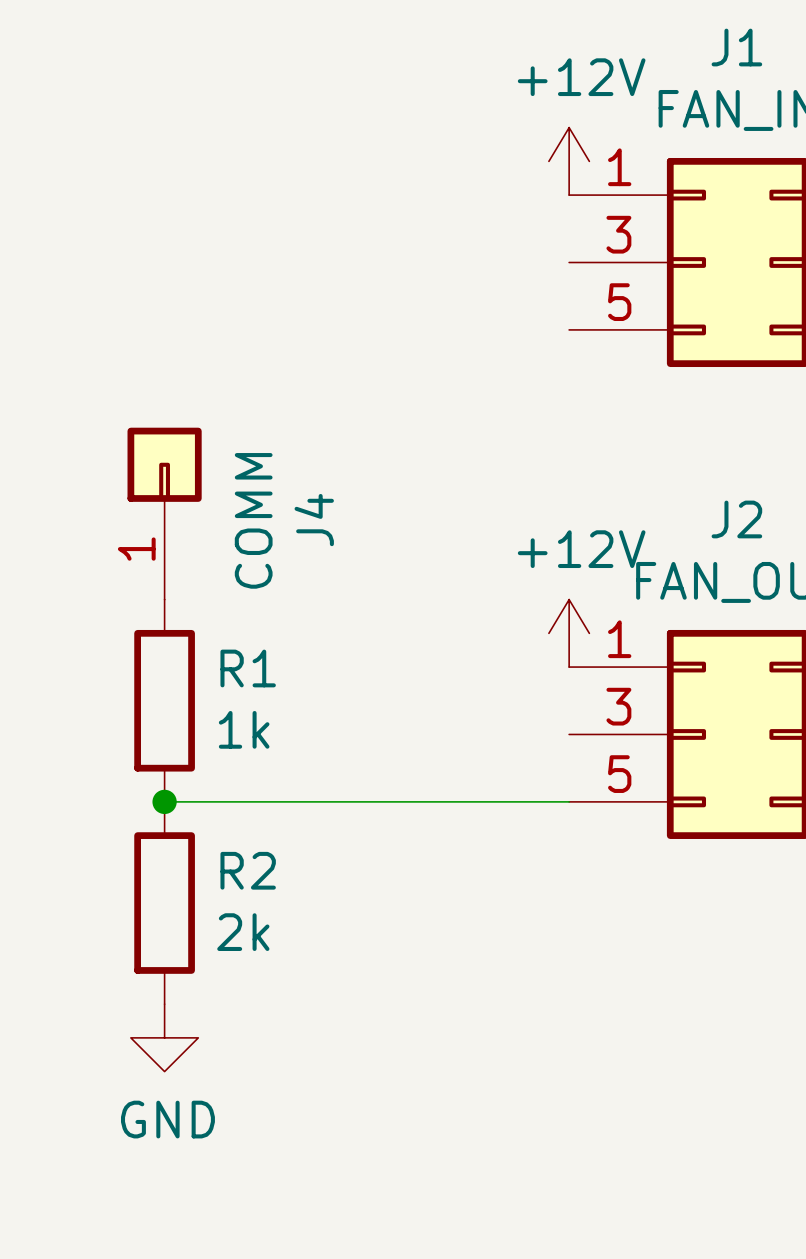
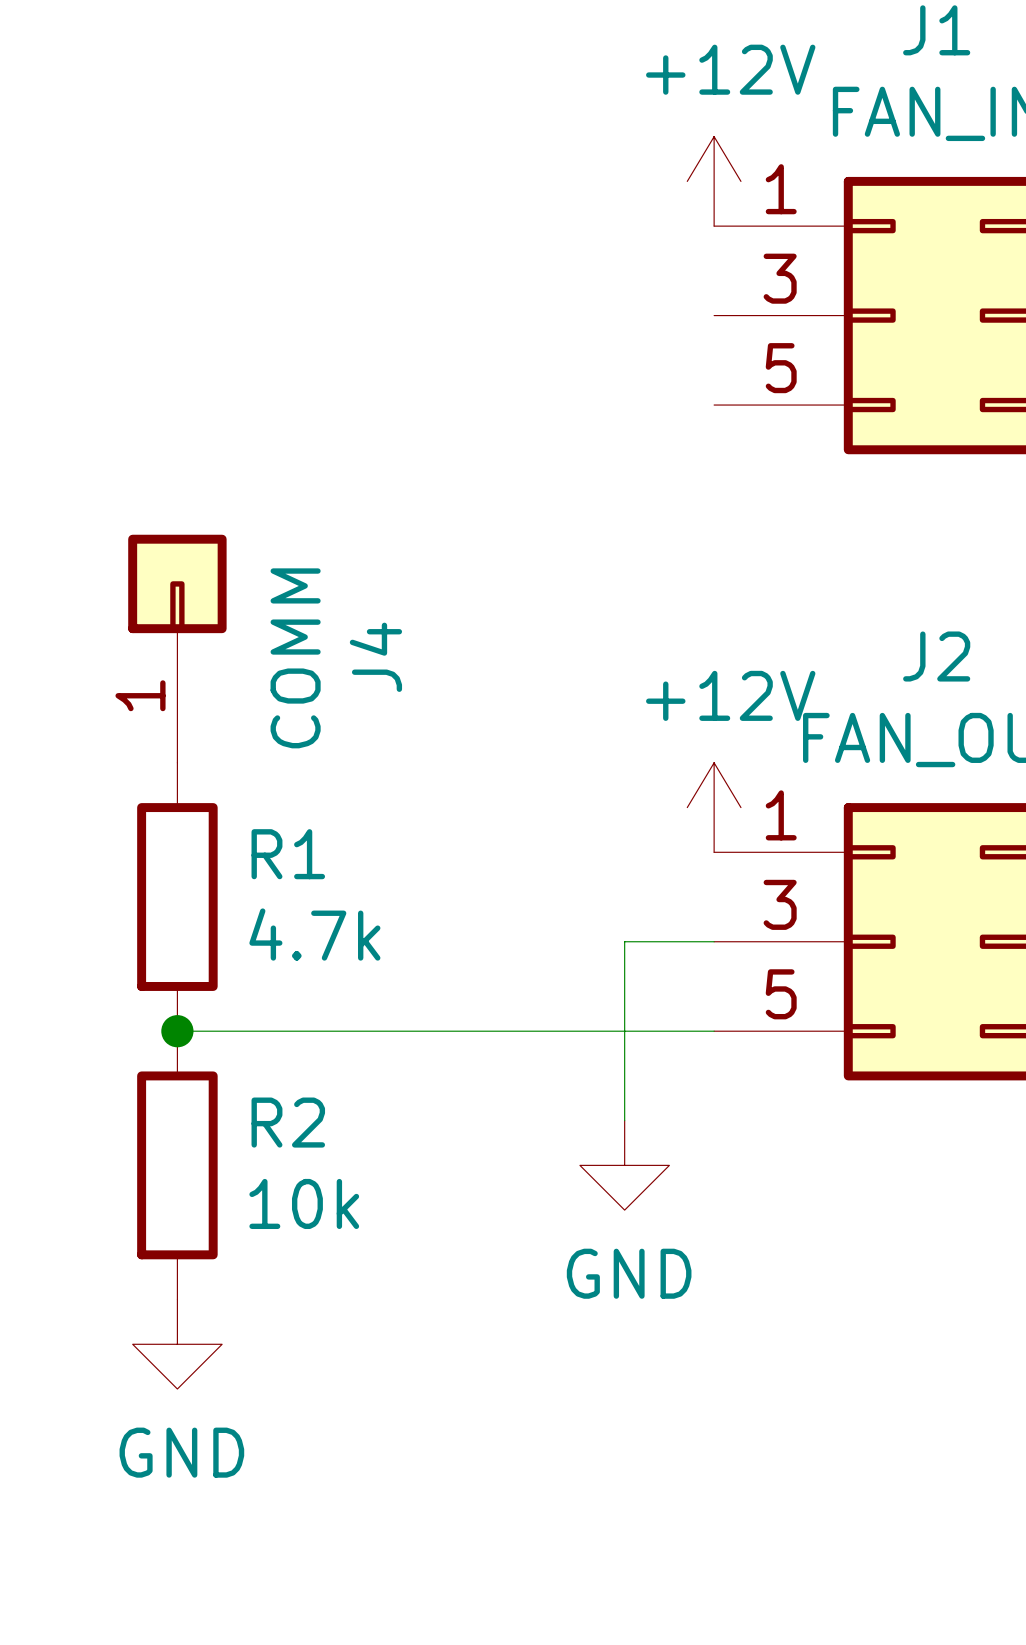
R1 value: 1k (244, 729) -> 4.7k (314, 934)
wire: none -> (714, 941) (624, 941) (624, 1120)
power symbol: none -> GND (624, 1165)
R2 value: 2k (243, 932) -> 10k (304, 1203)

